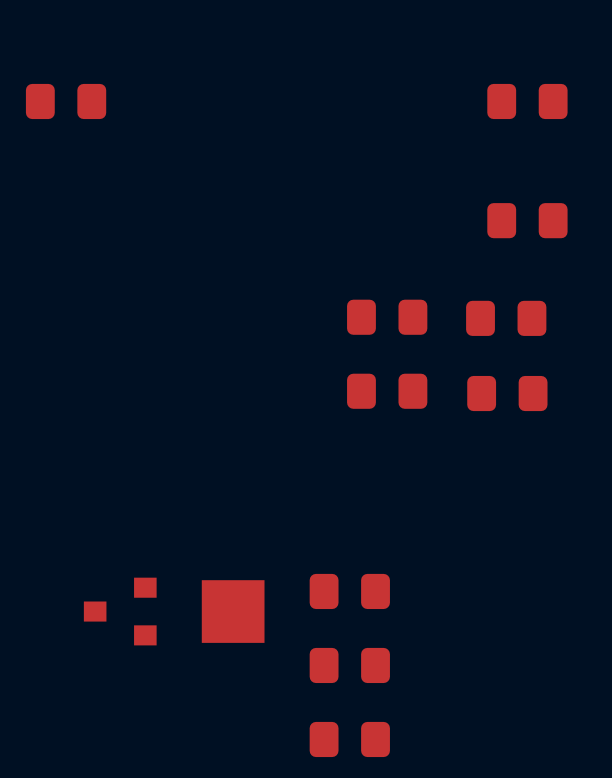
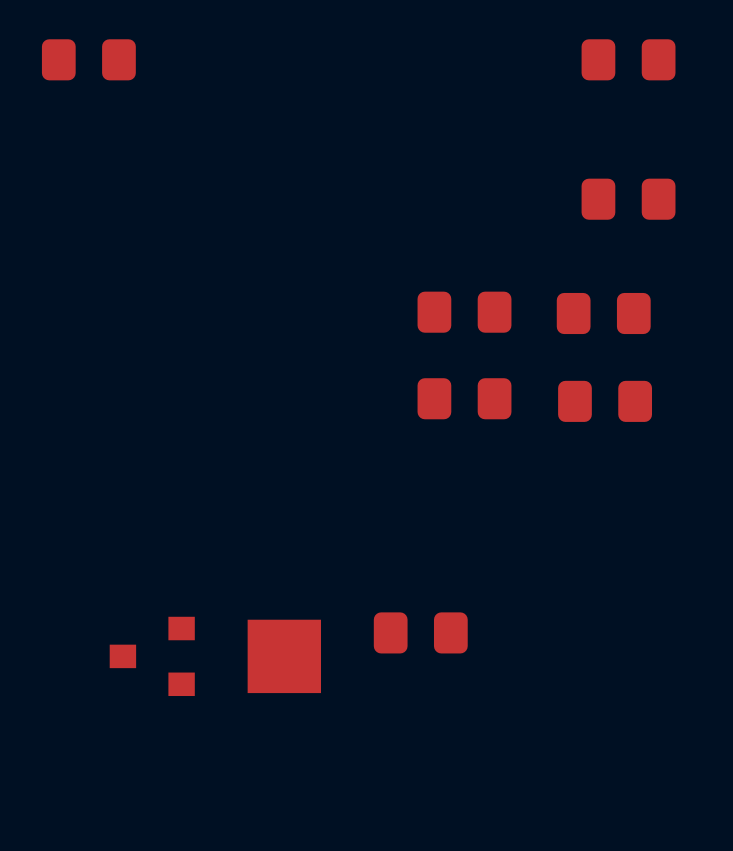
part: (349, 665) -> none
part: (349, 739) -> none

